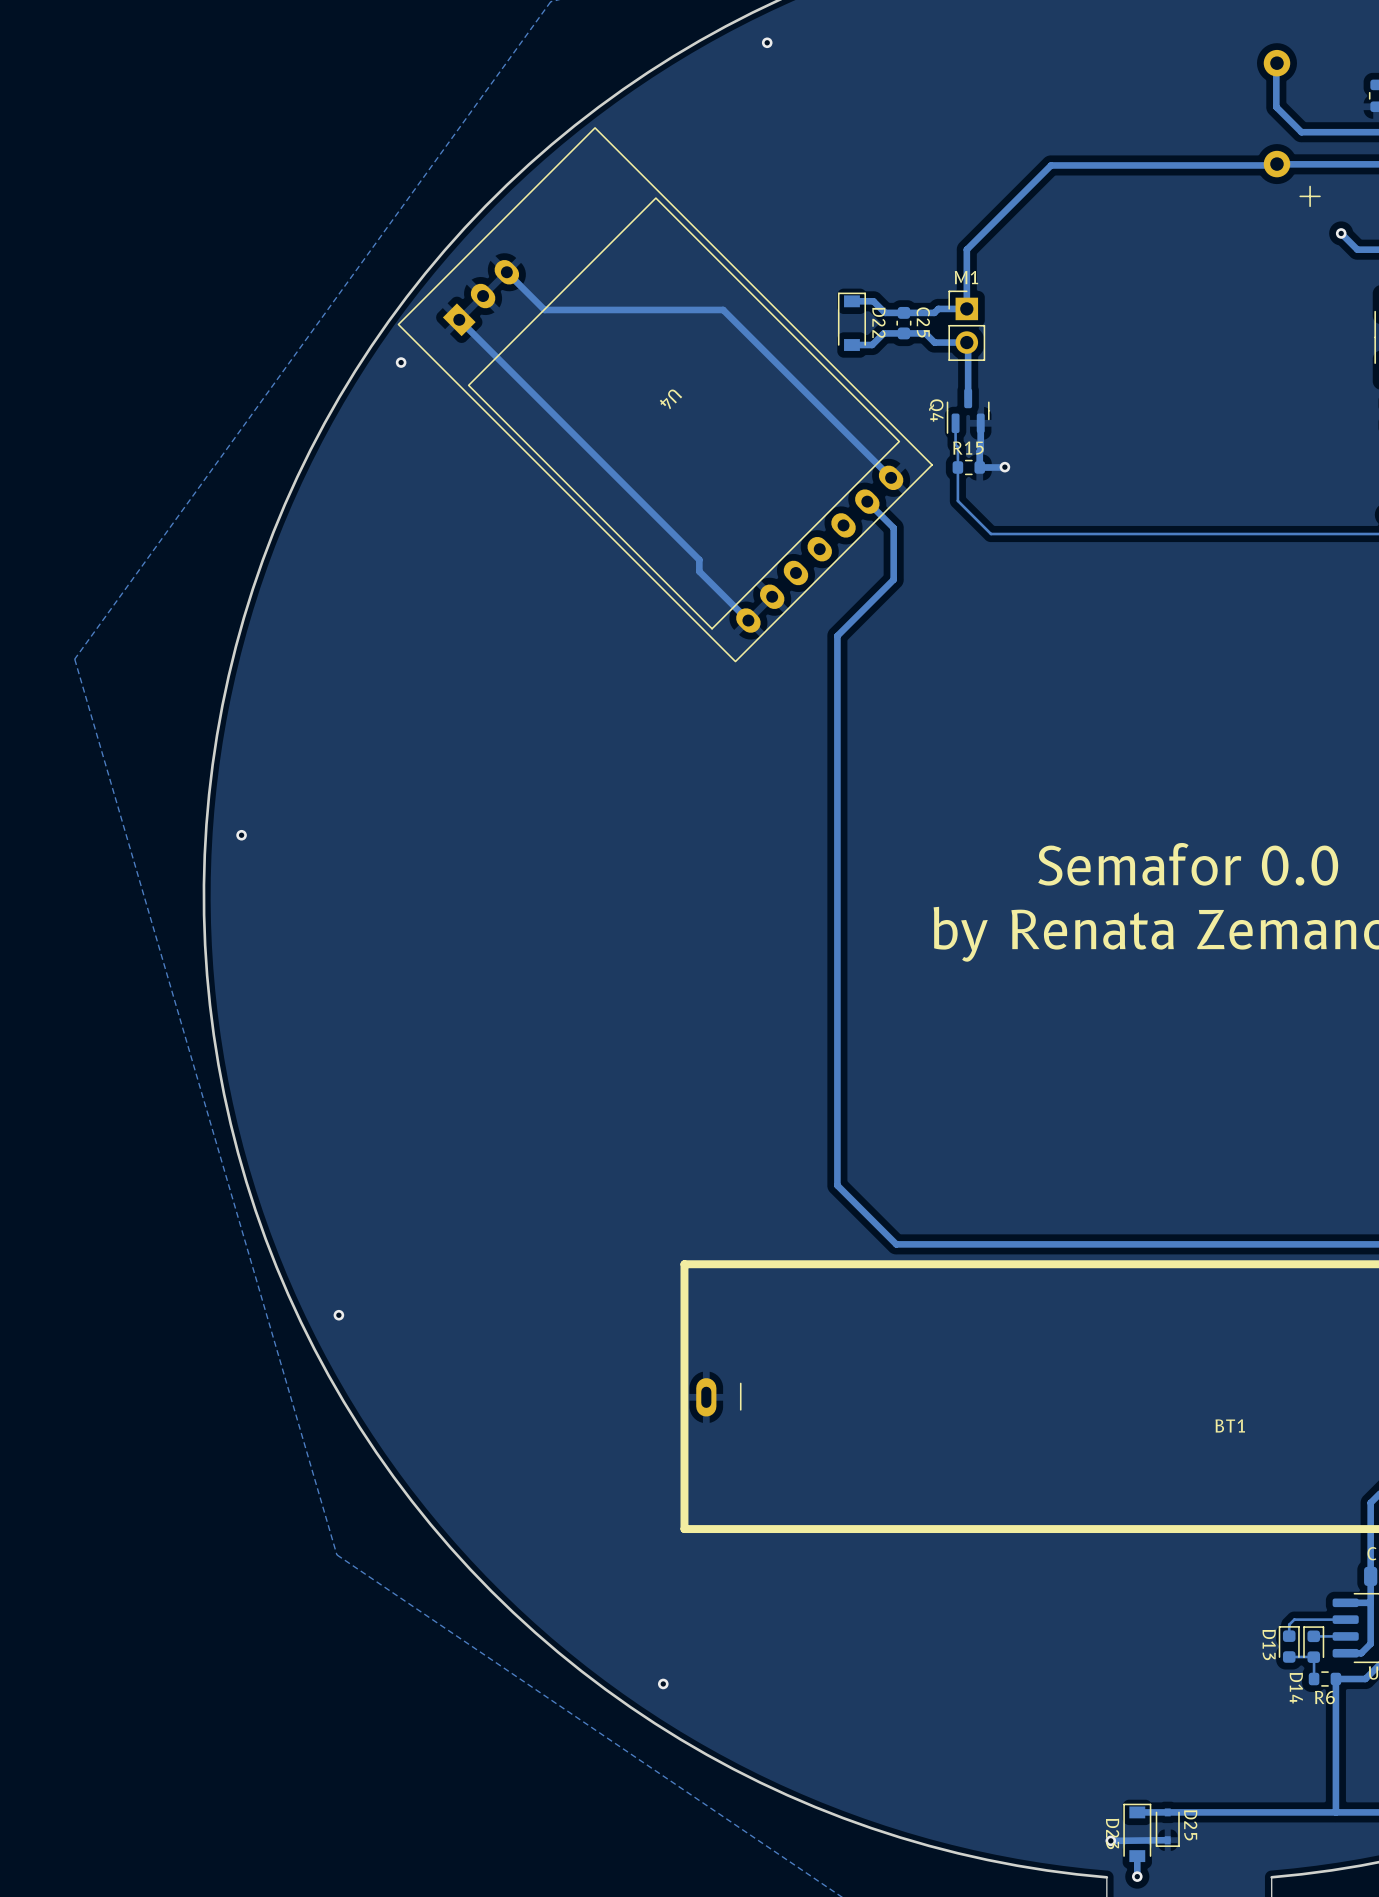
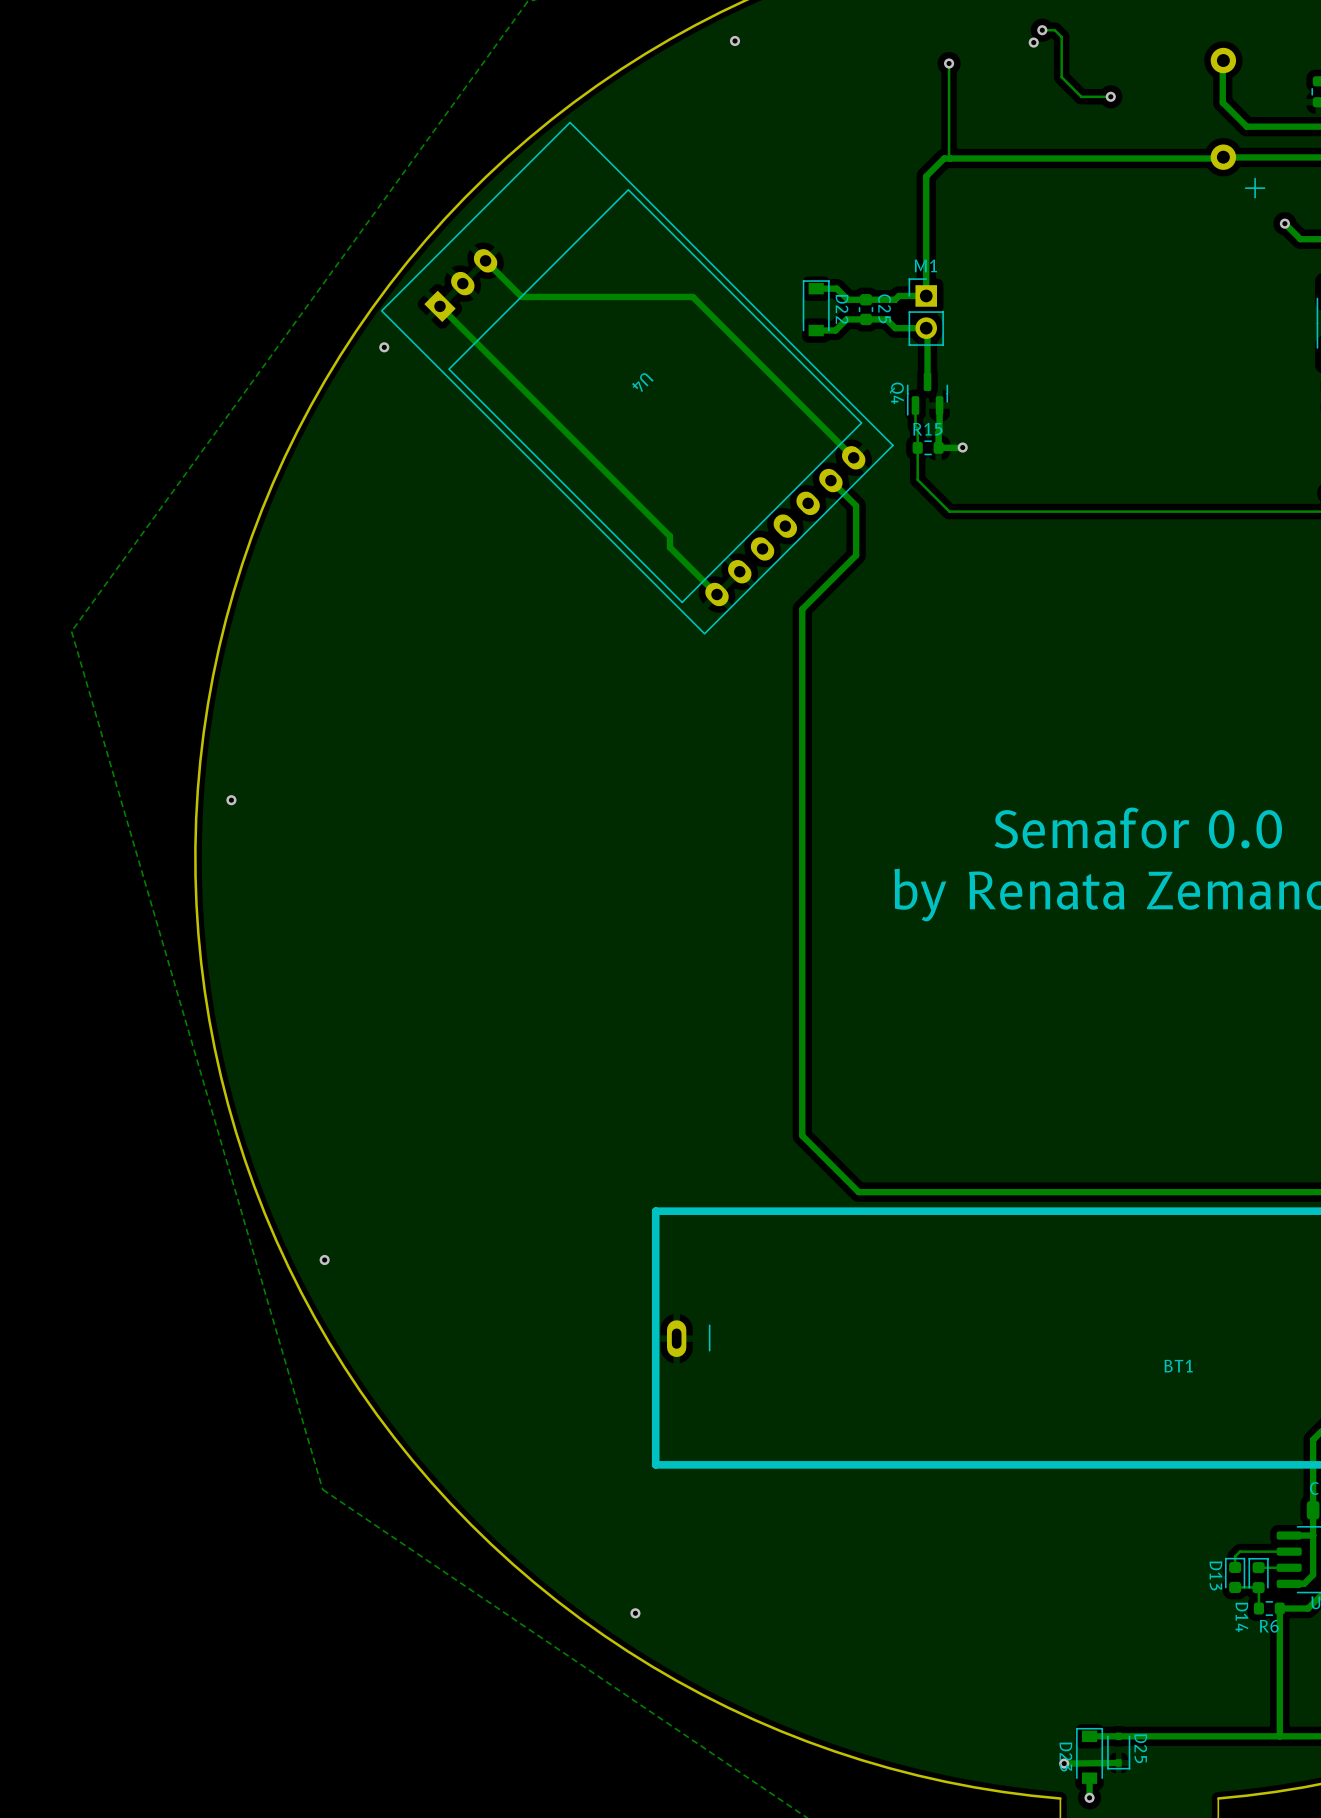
track: none -> (1042, 30) (1054, 30) (1061, 37) (1061, 77) (1081, 96) (1110, 96)
via: none -> (1042, 30)
via: none -> (1033, 42)
track: none -> (949, 63) (950, 158)
via: none -> (949, 63)
via: none -> (1110, 96)
track: (1051, 165) (966, 249) -> (1006, 158) (944, 158) (926, 176) (926, 239)

